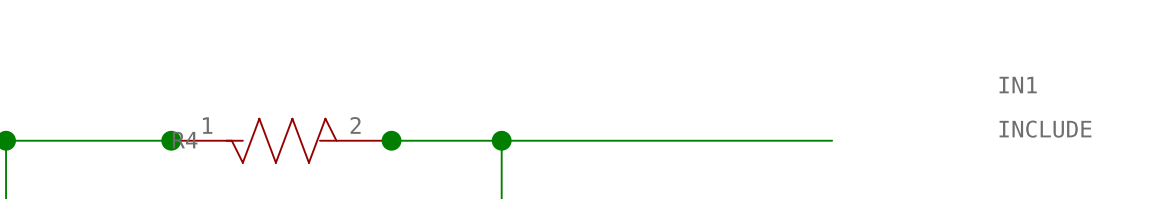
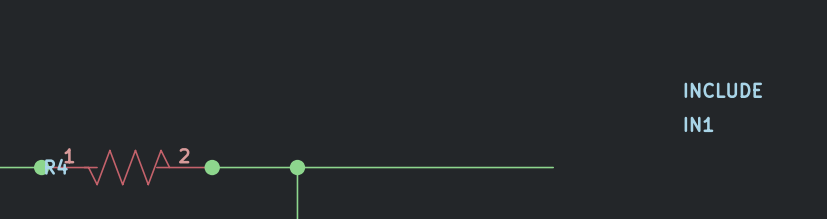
IN1 position: (1045, 107) -> (723, 107)
IN1 value position: INCLUDE (1045, 129) -> INCLUDE (723, 90)

